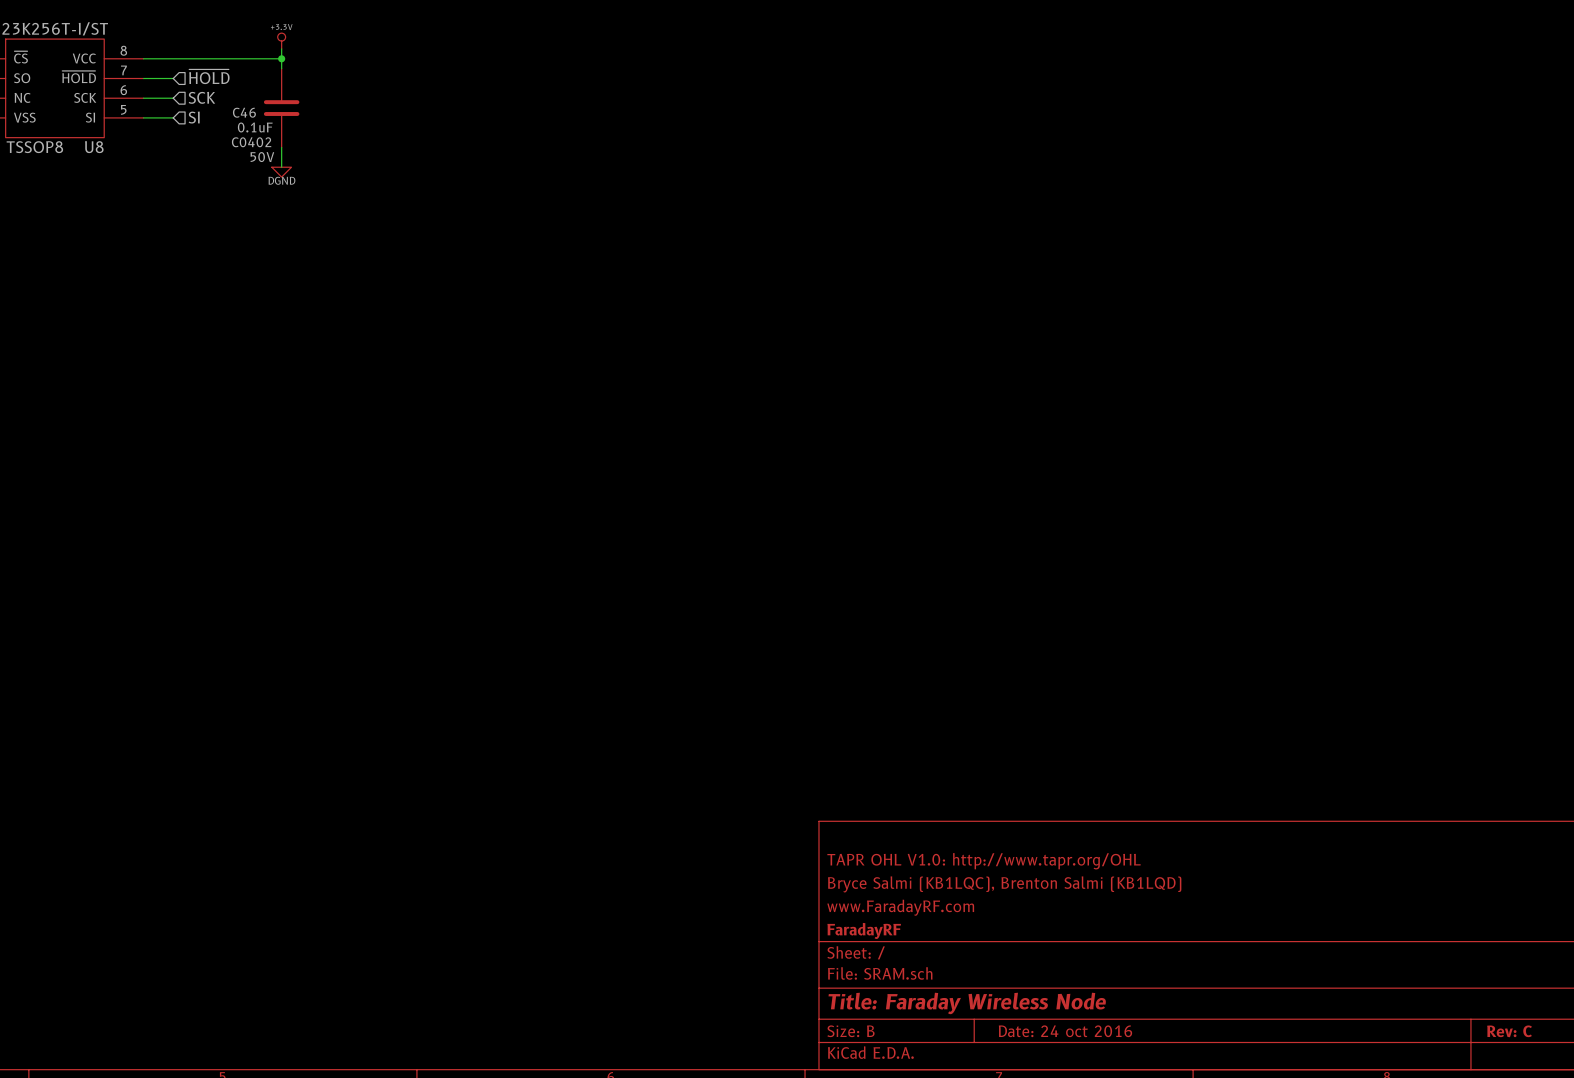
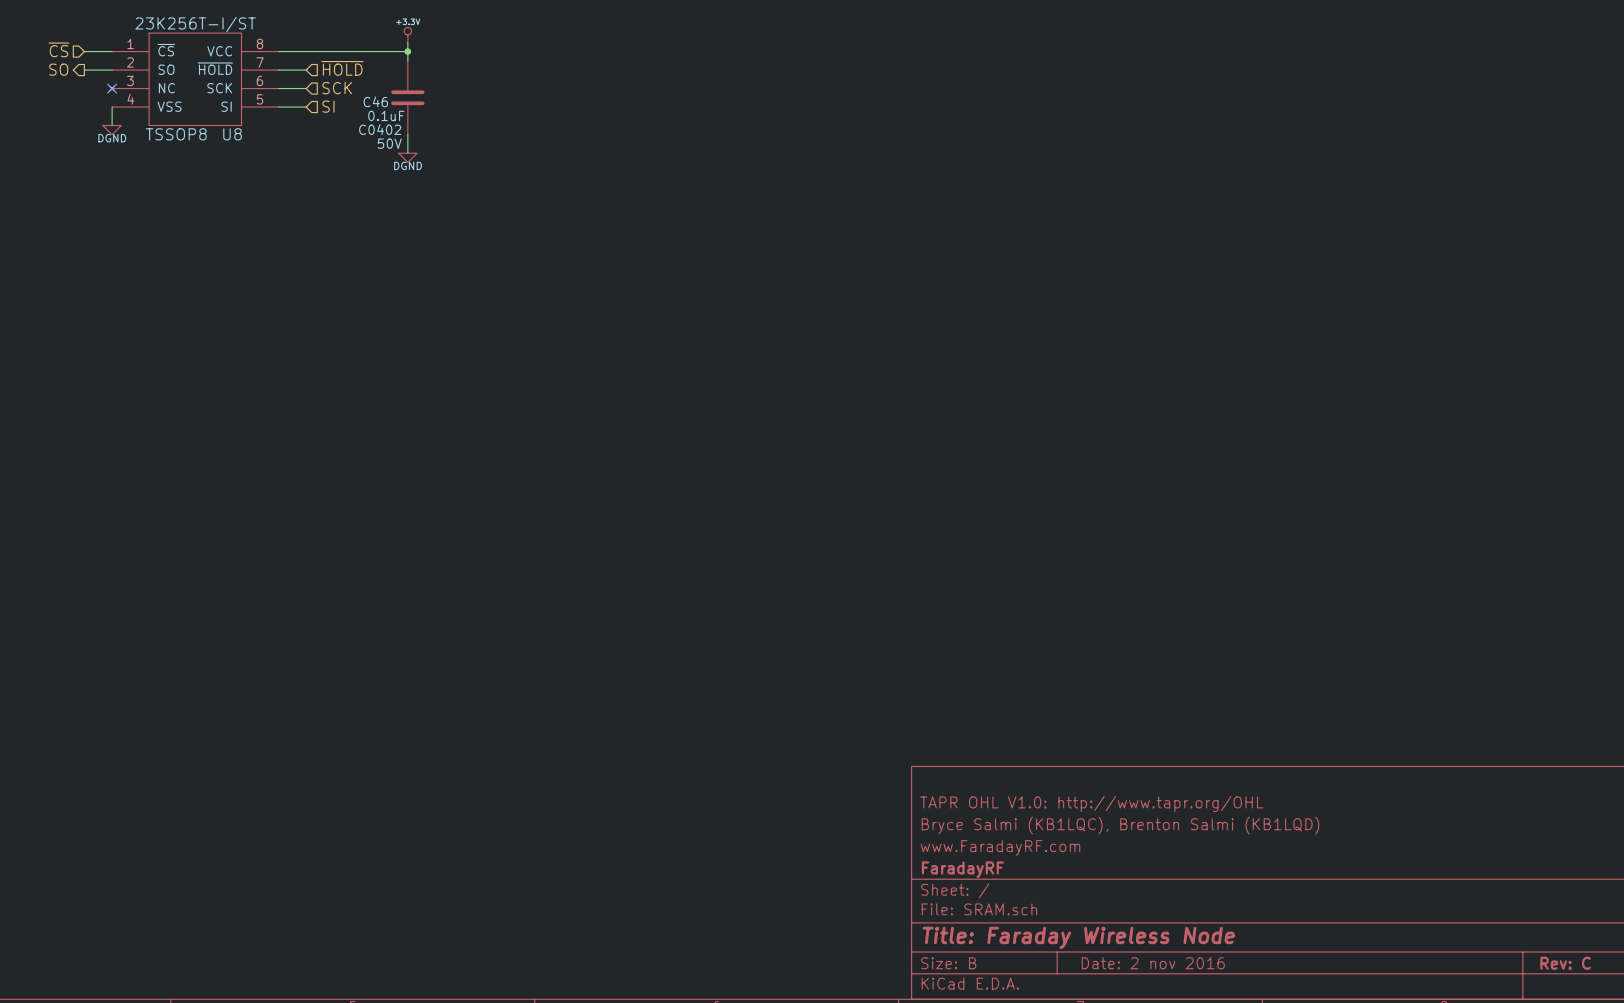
title block: Date: 24 oct 2016 (1065, 1031) -> Date: 2 nov 2016 (1153, 963)

